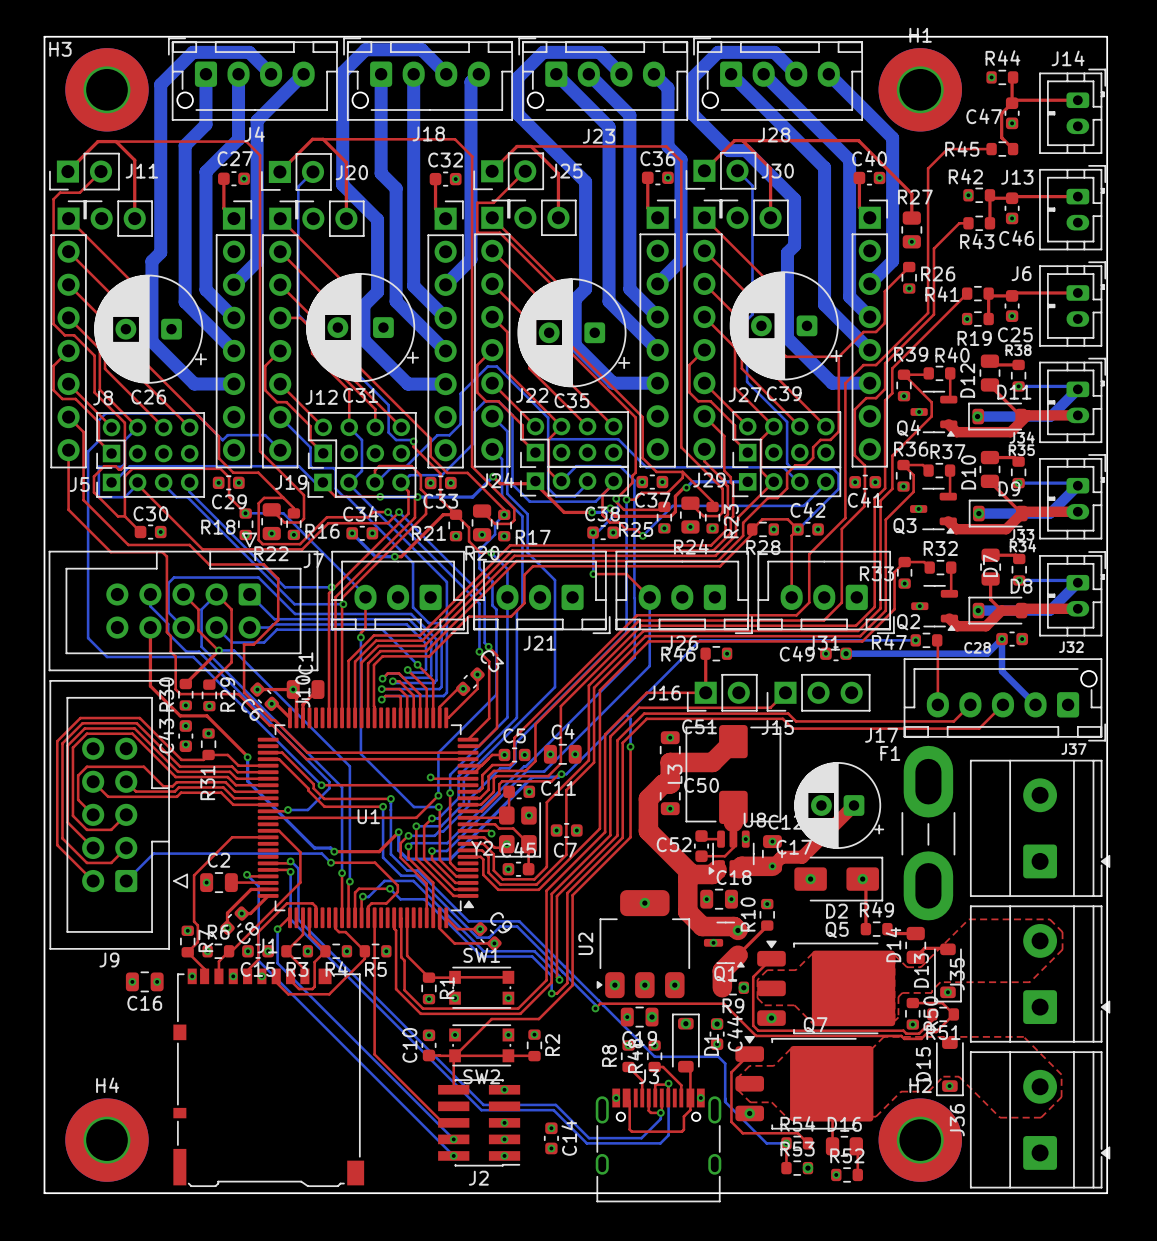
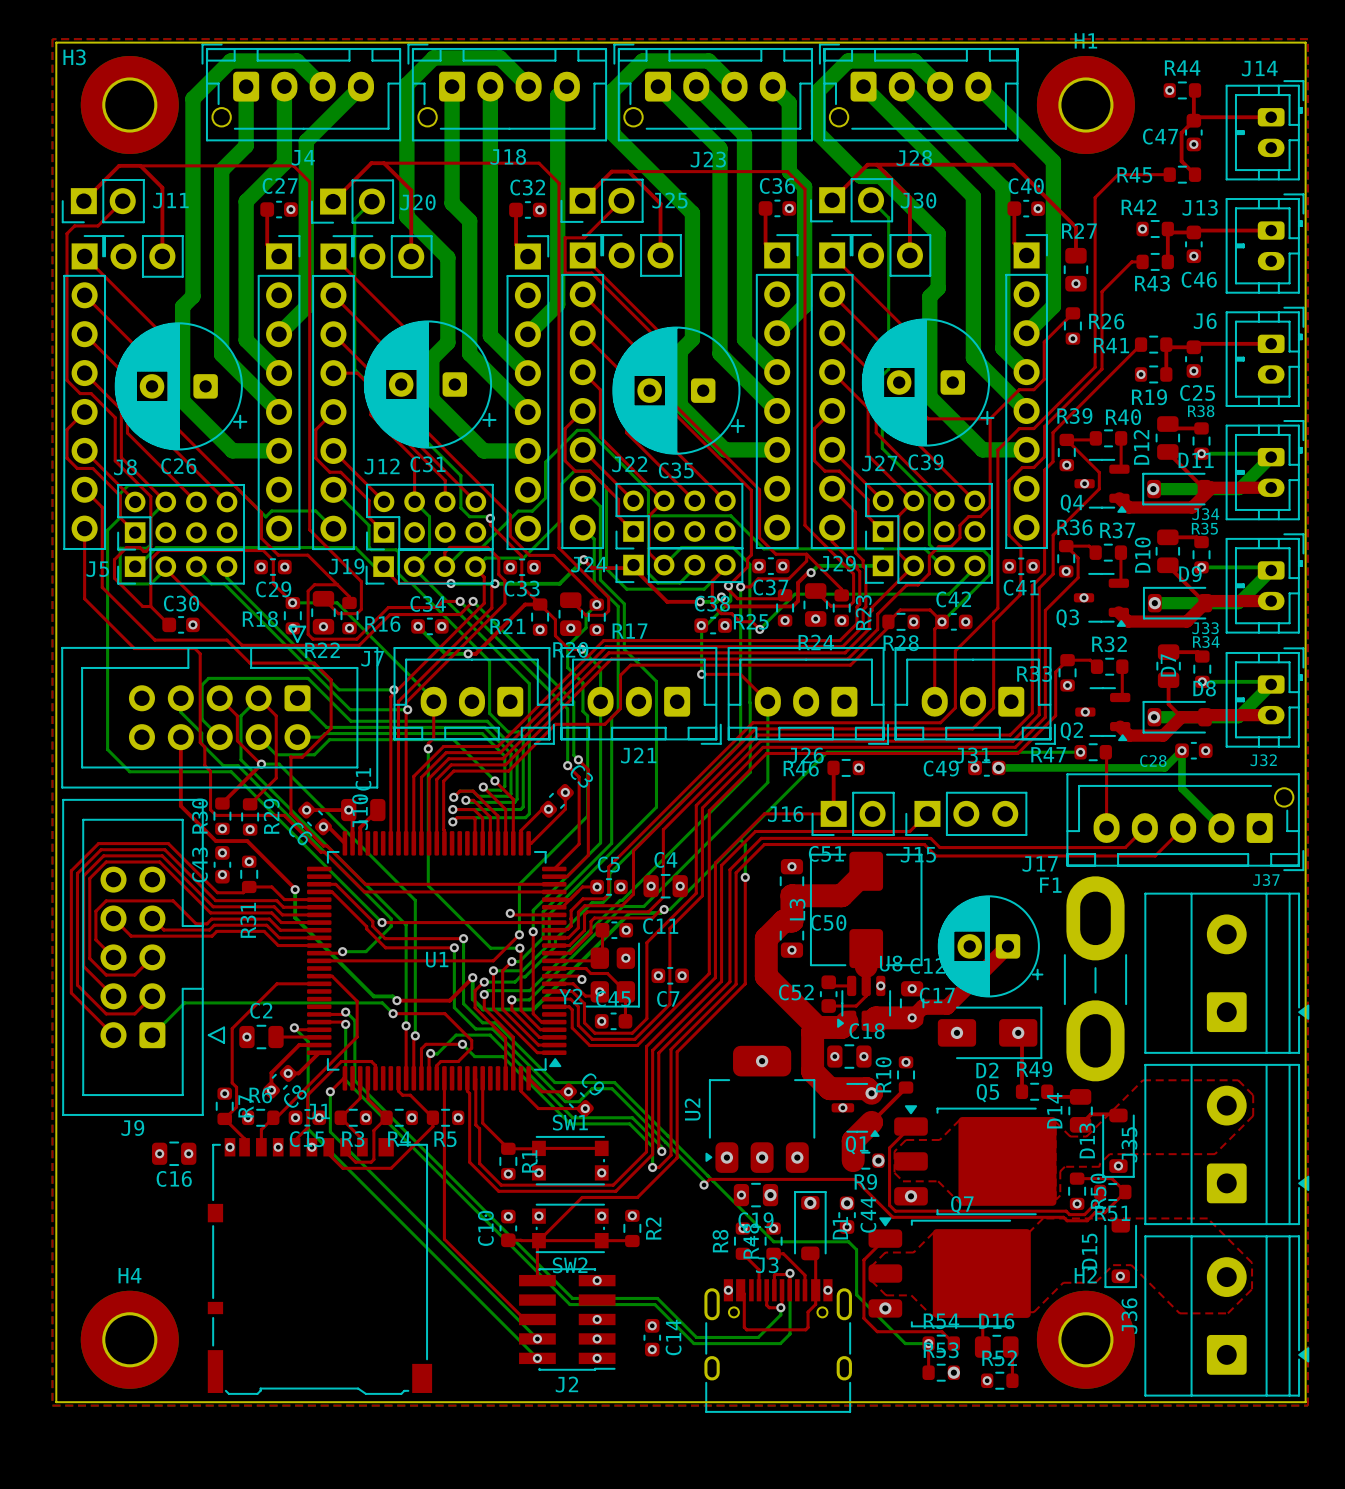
top zone outline: none -> (52, 39) (1307, 39) (1307, 1405) (52, 1405) (52, 39)

